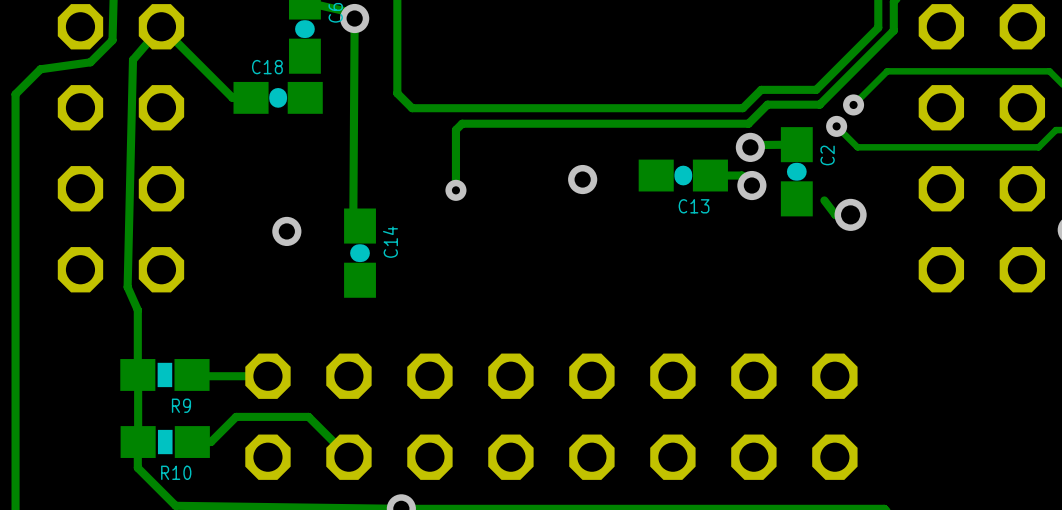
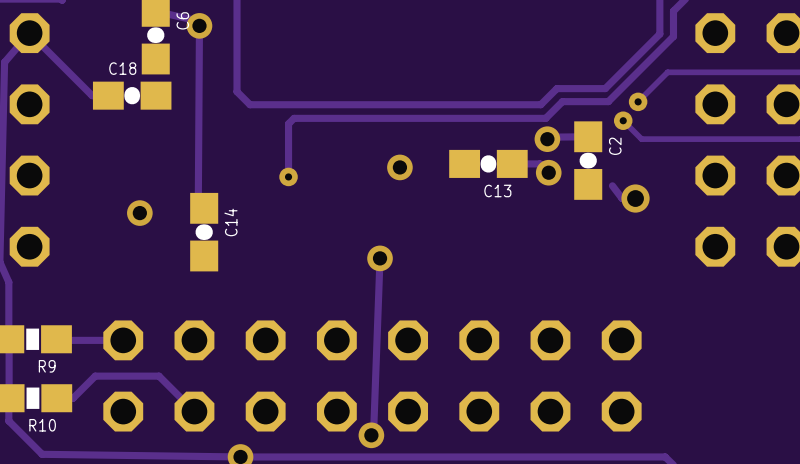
track: none -> (380, 258) (373, 433) (371, 435)
via: none -> (380, 258)
via: none -> (371, 435)

